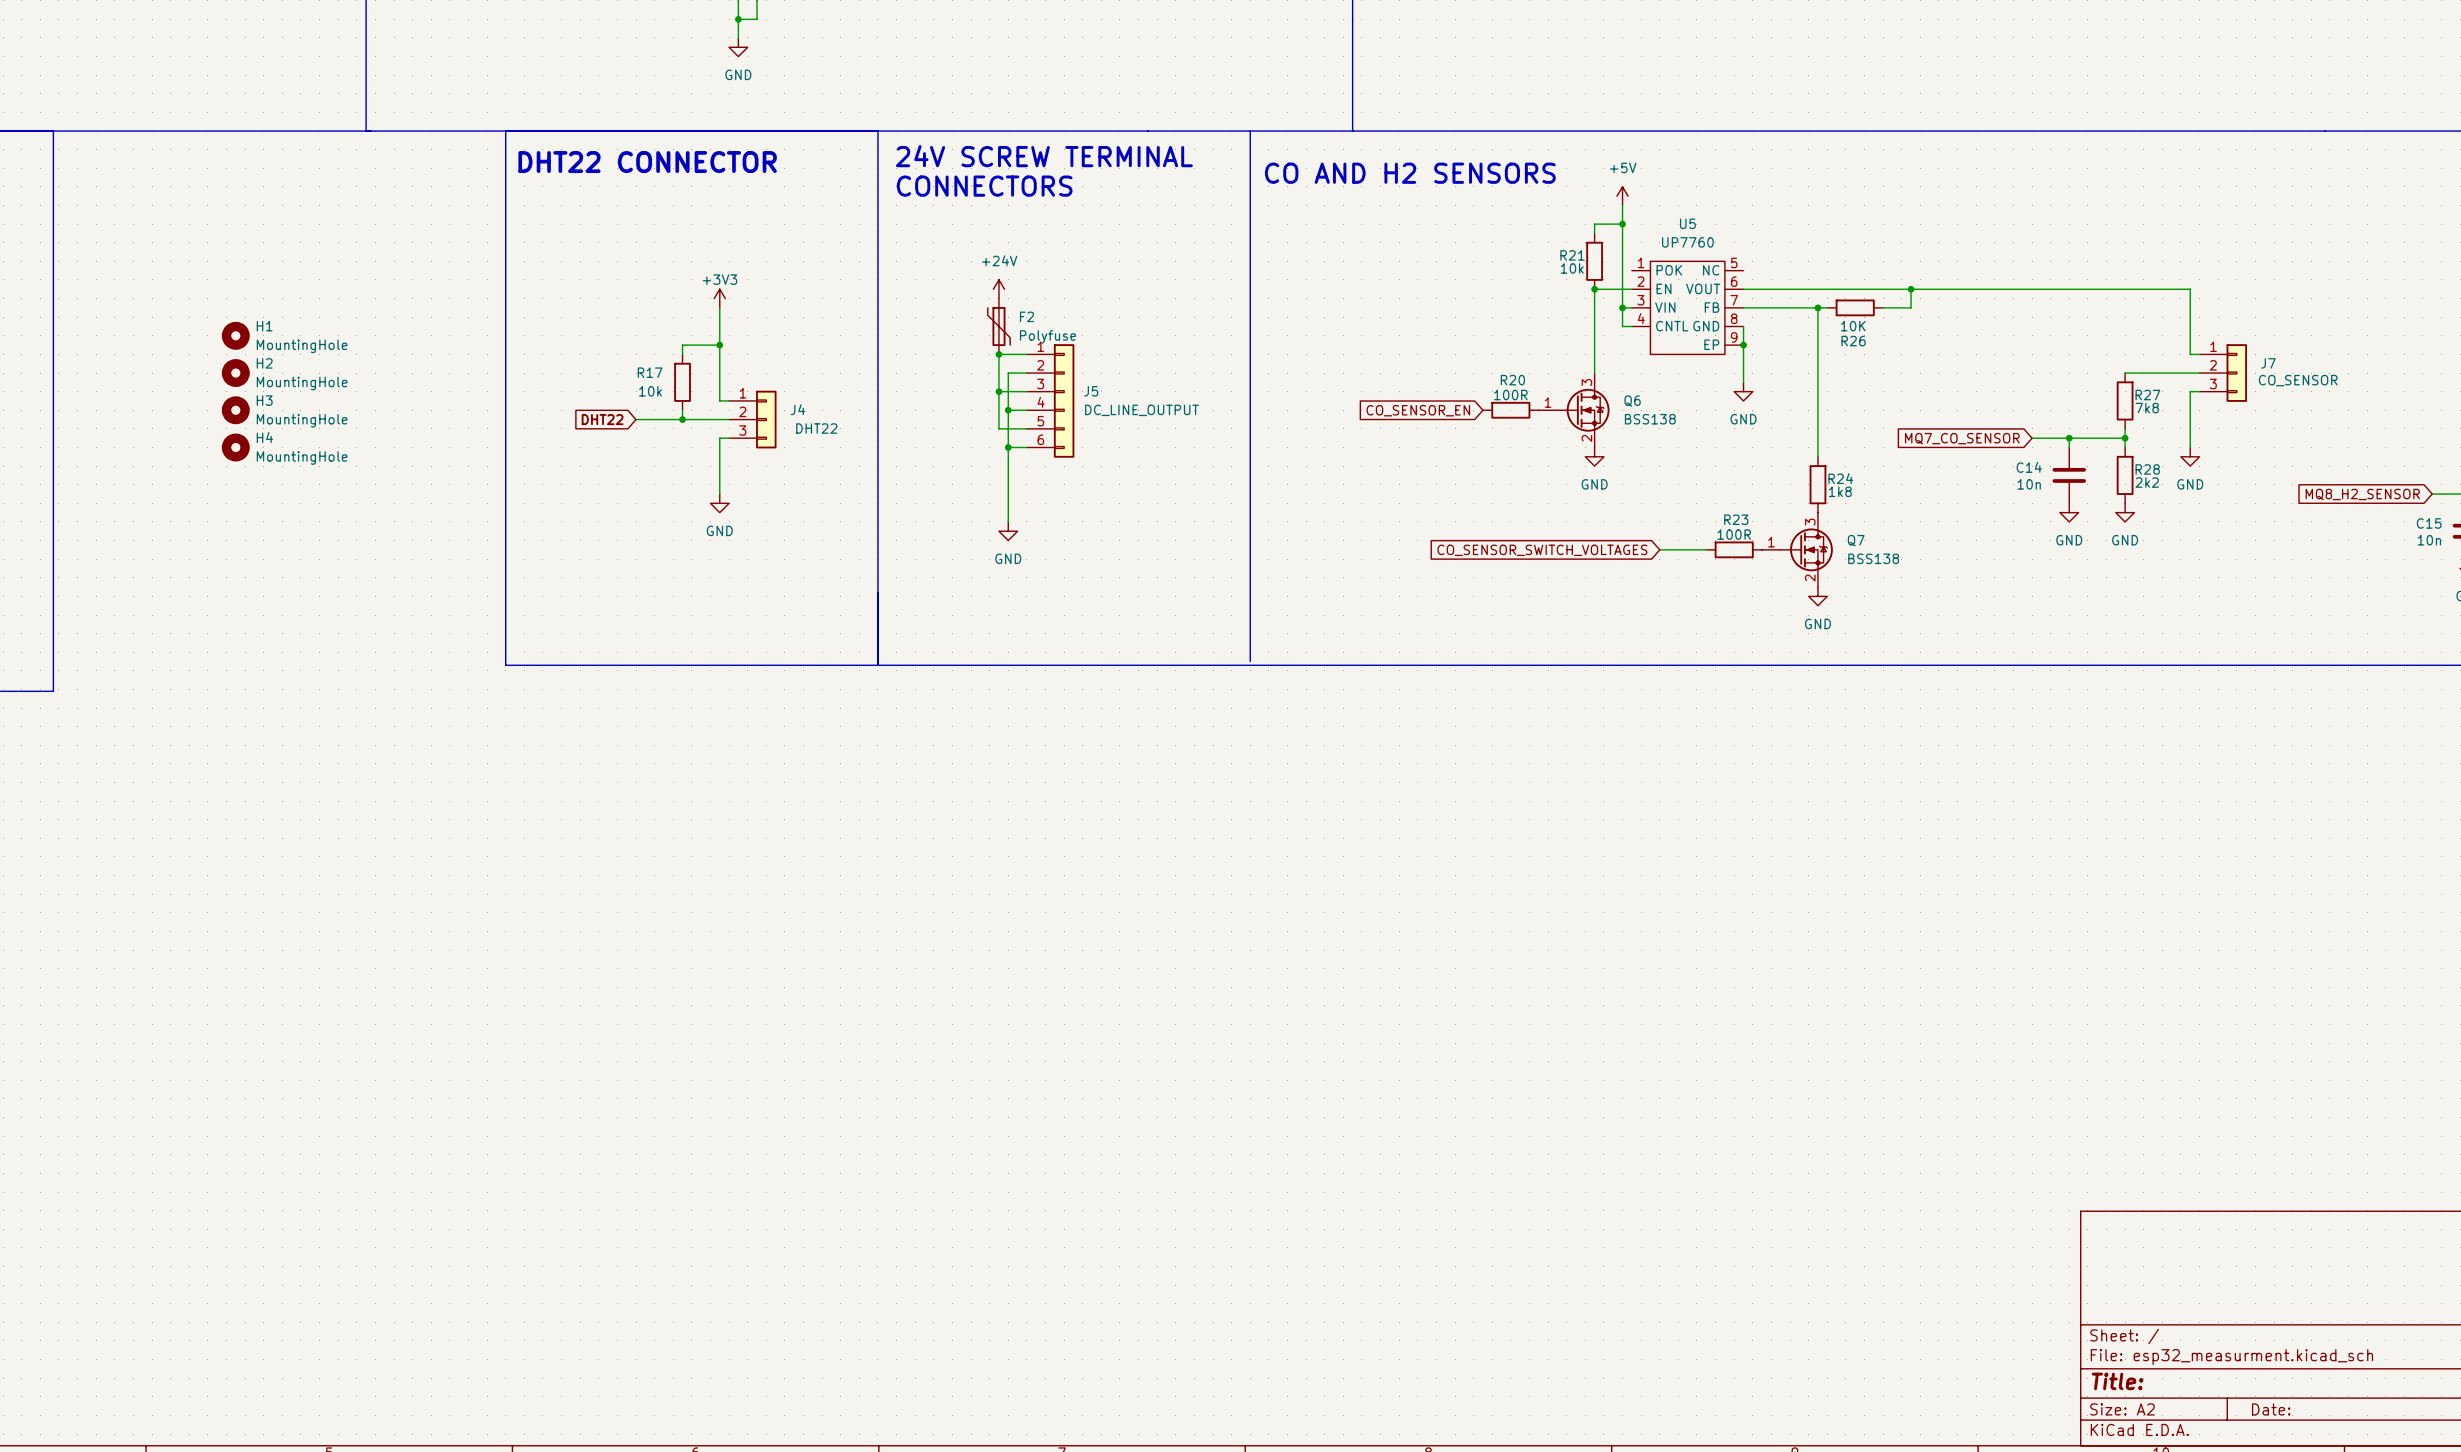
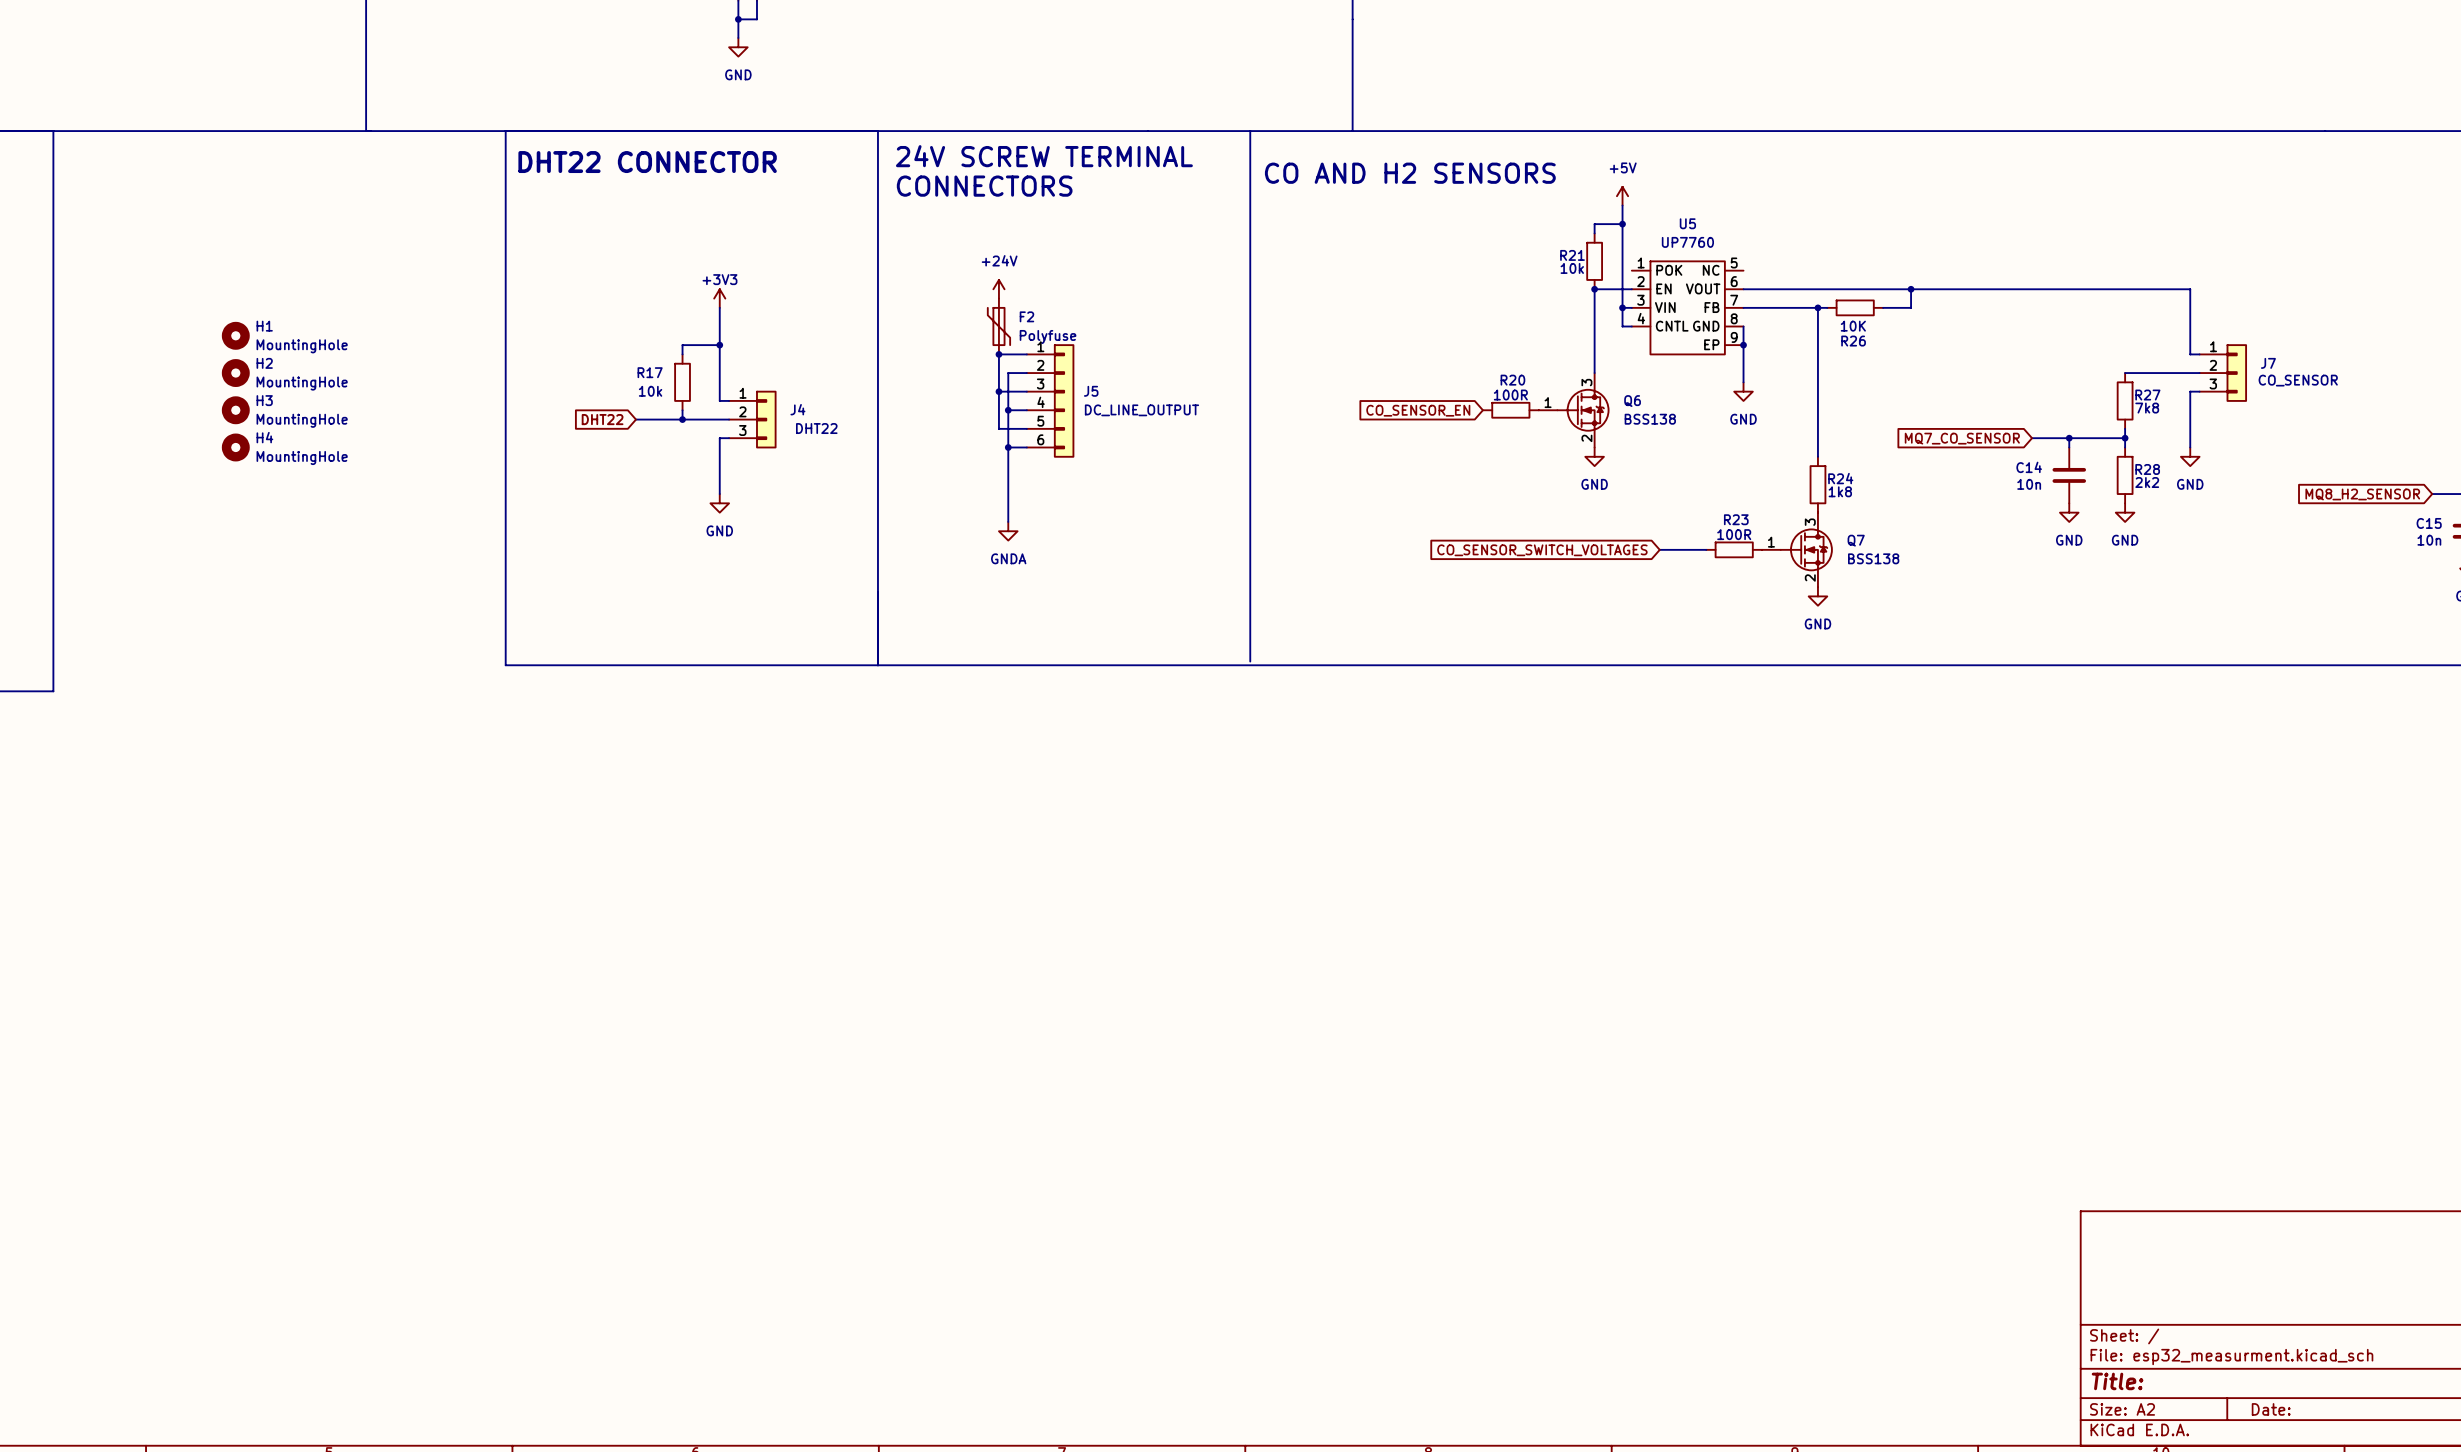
power symbol: GND (1008, 531) -> GNDA (1008, 531)

